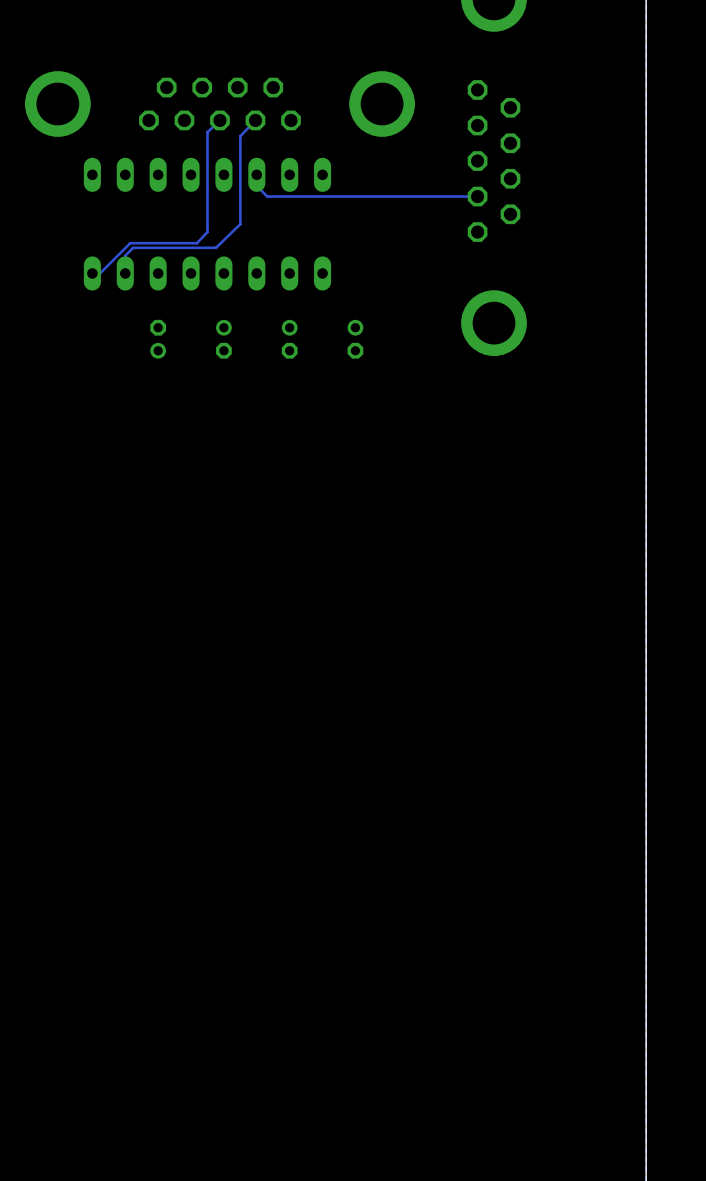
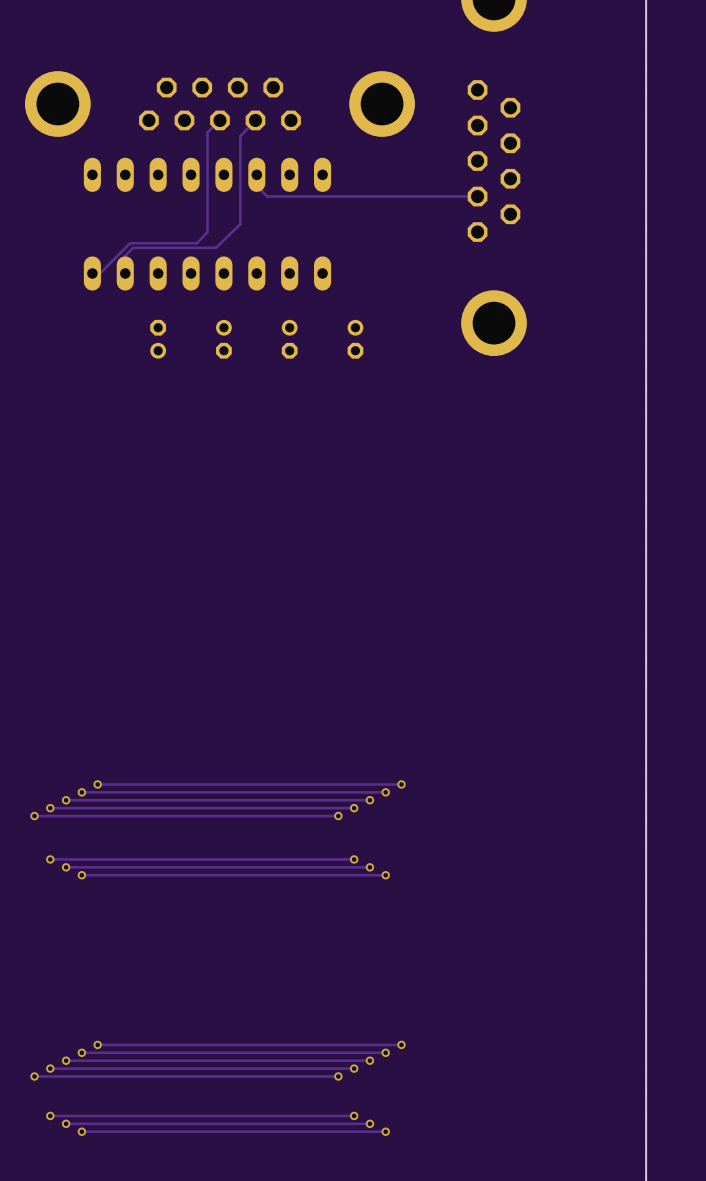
via: none -> (97, 784)
track: none -> (401, 784) (97, 784)
via: none -> (401, 784)
via: none -> (81, 792)
track: none -> (385, 792) (81, 792)
via: none -> (385, 792)
via: none -> (66, 800)
track: none -> (369, 800) (66, 800)
via: none -> (369, 800)
via: none -> (50, 808)
track: none -> (354, 808) (50, 808)
via: none -> (354, 808)
via: none -> (34, 816)
track: none -> (338, 816) (34, 816)
via: none -> (338, 816)
via: none -> (50, 859)
track: none -> (354, 859) (50, 859)
via: none -> (354, 859)
via: none -> (66, 867)
track: none -> (369, 867) (66, 867)
via: none -> (369, 867)
via: none -> (81, 875)
track: none -> (385, 875) (81, 875)
via: none -> (385, 875)
via: none -> (97, 1044)
track: none -> (401, 1044) (97, 1044)
via: none -> (401, 1044)
via: none -> (81, 1052)
track: none -> (385, 1052) (81, 1052)
via: none -> (385, 1052)
via: none -> (66, 1060)
track: none -> (369, 1060) (66, 1060)
via: none -> (369, 1060)
via: none -> (50, 1068)
track: none -> (354, 1068) (50, 1068)
via: none -> (354, 1068)
via: none -> (34, 1076)
track: none -> (338, 1076) (34, 1076)
via: none -> (338, 1076)
via: none -> (50, 1115)
track: none -> (354, 1115) (50, 1115)
via: none -> (354, 1115)
via: none -> (66, 1123)
track: none -> (369, 1123) (66, 1123)
via: none -> (369, 1123)
via: none -> (81, 1131)
track: none -> (385, 1131) (81, 1131)
via: none -> (385, 1131)

